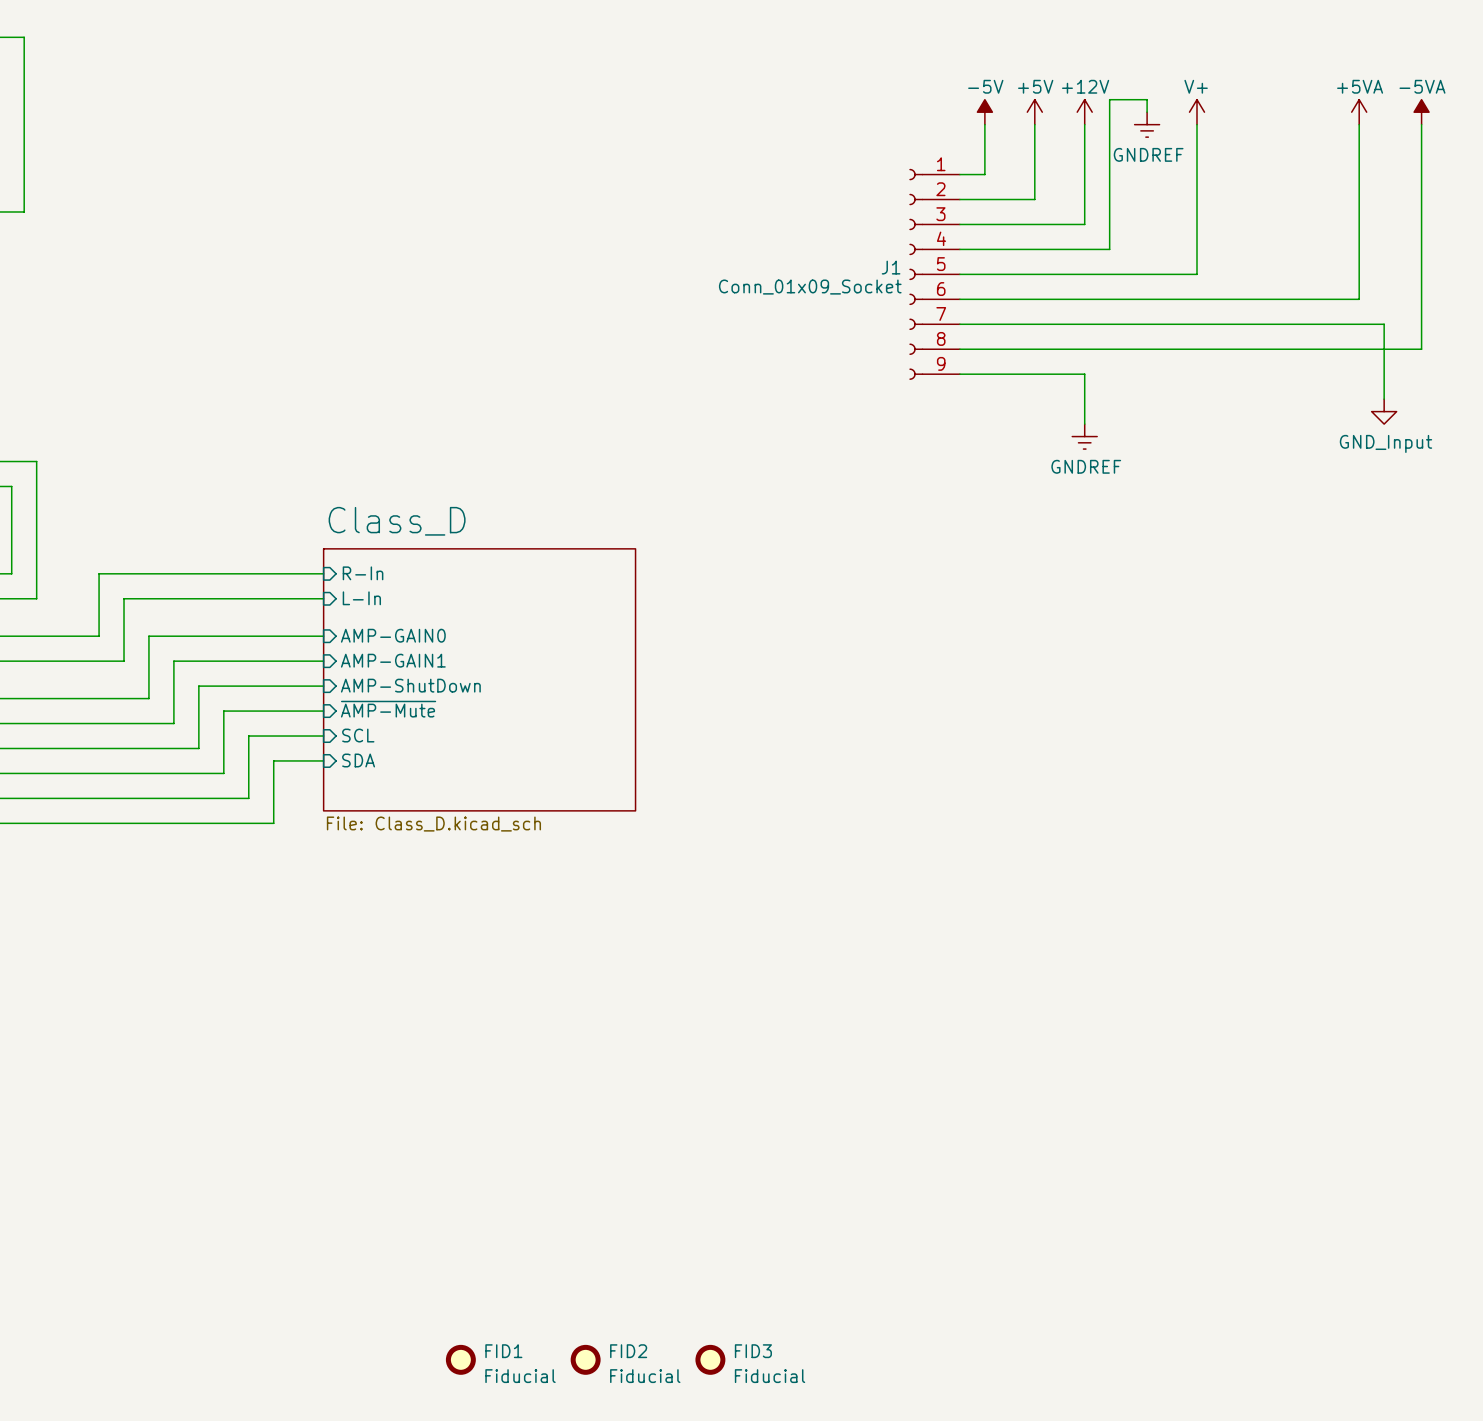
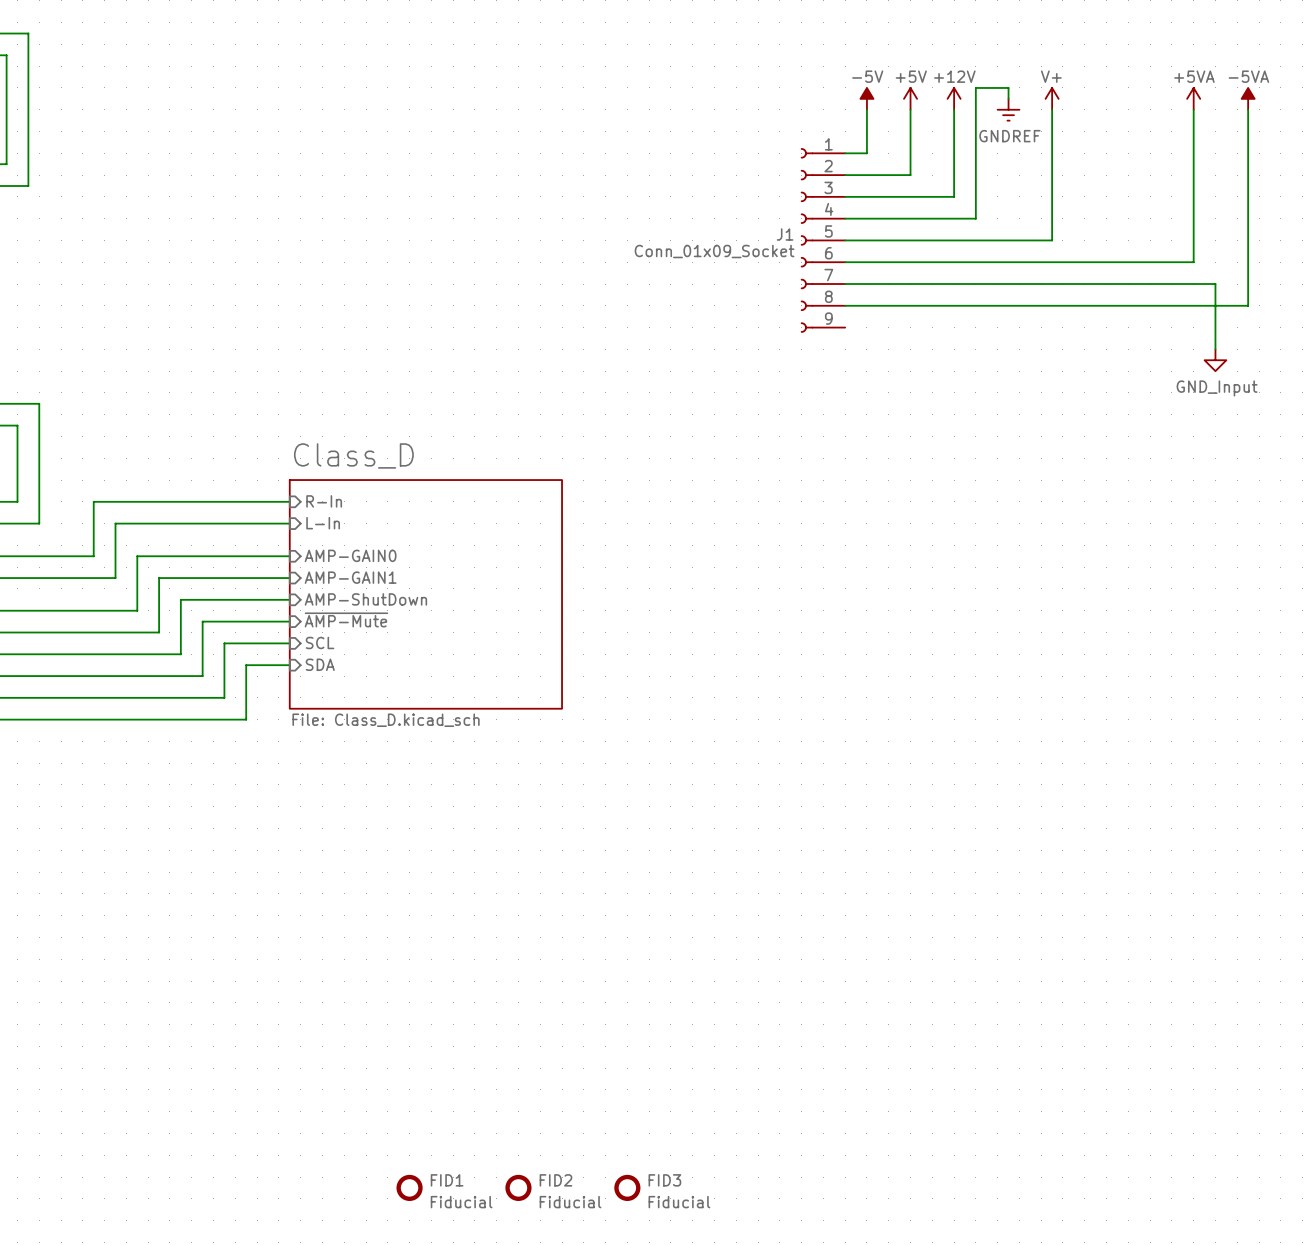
wire: (959, 374) (1084, 374) (1084, 424) -> none
power symbol: GNDREF (1084, 436) -> none

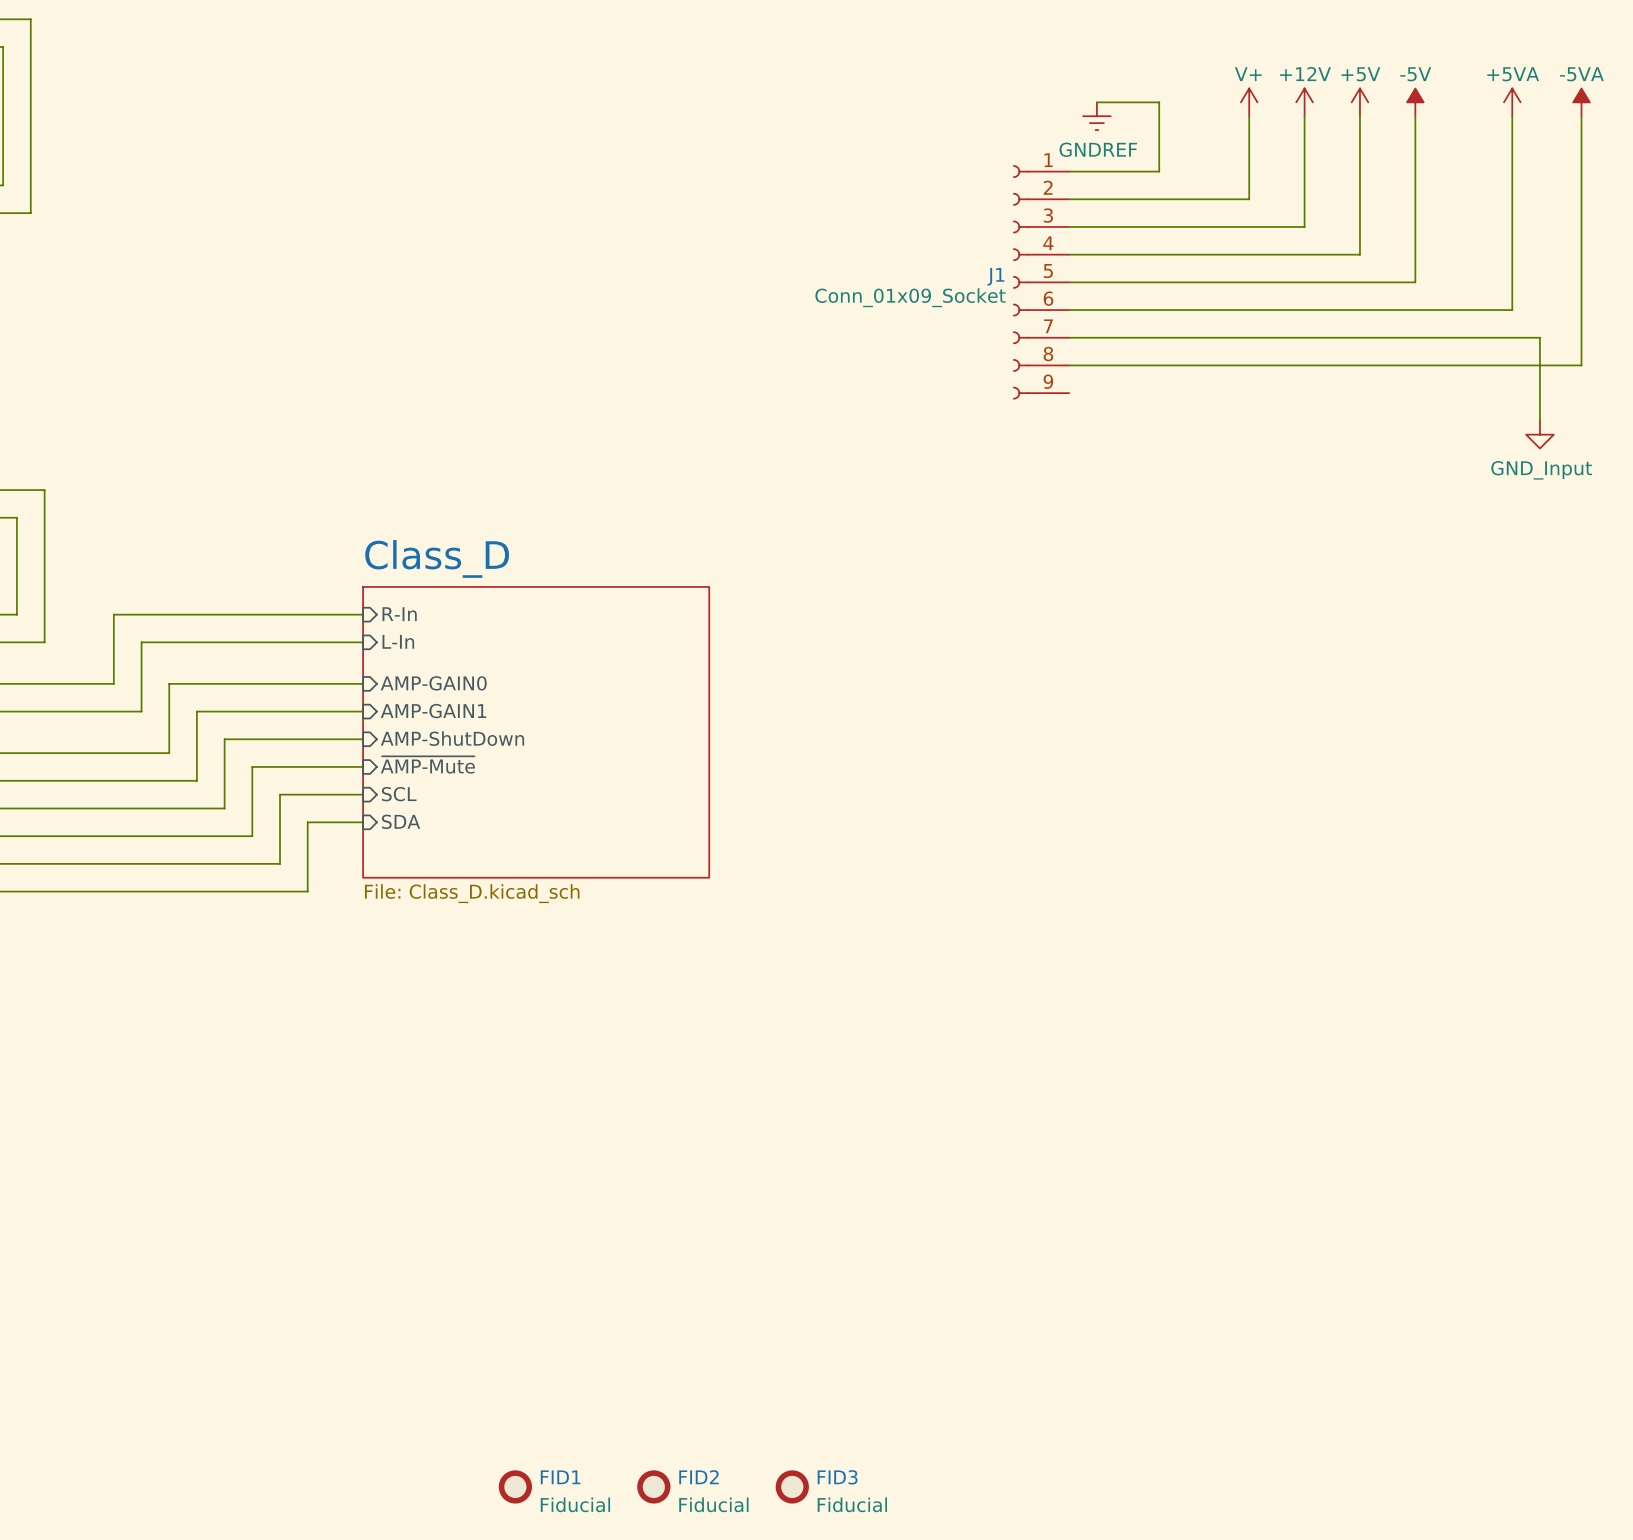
power symbol: -5V (866, 98) -> none
power symbol position: +5V (910, 98) -> +5V (1359, 102)
power symbol position: +12V (954, 98) -> +12V (1304, 102)
wire: (1008, 98) (1008, 87) (975, 87) (975, 218) -> (1359, 116) (1359, 254) (1235, 254)
power symbol position: V+ (1052, 98) -> V+ (1249, 102)
power symbol: none -> -5V (1415, 102)
wire: (866, 109) (866, 153) -> (1096, 102) (1159, 102) (1159, 171) (1096, 171)
wire: (910, 109) (910, 175) -> (1249, 116) (1249, 199) (1152, 199)
wire: (954, 109) (954, 196) -> (1304, 116) (1304, 226) (1207, 226)
power symbol position: GNDREF (1008, 109) -> GNDREF (1096, 116)
wire: (1052, 109) (1052, 240) -> (1415, 116) (1415, 282) (1332, 282)

